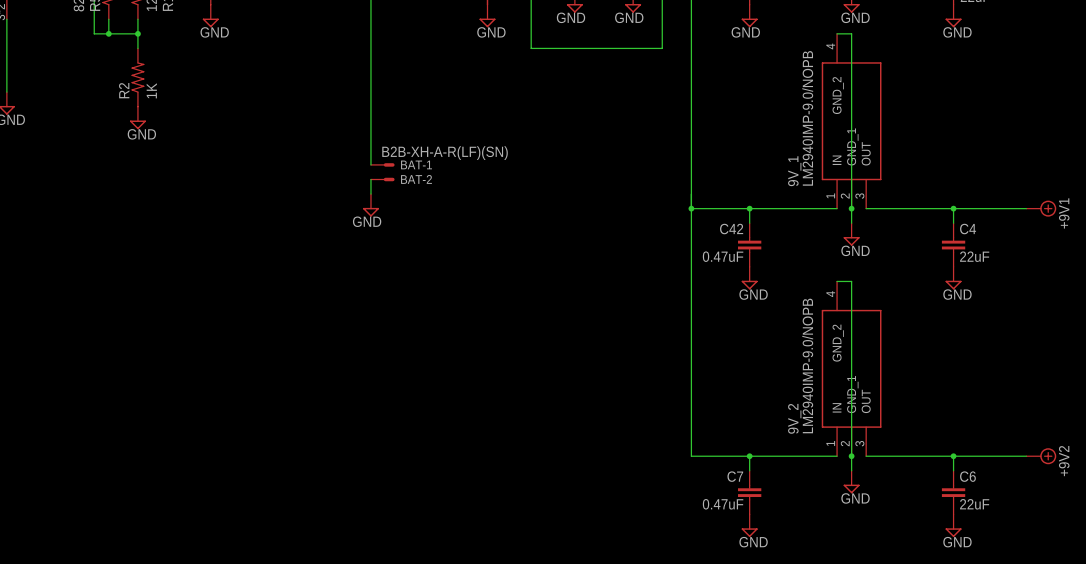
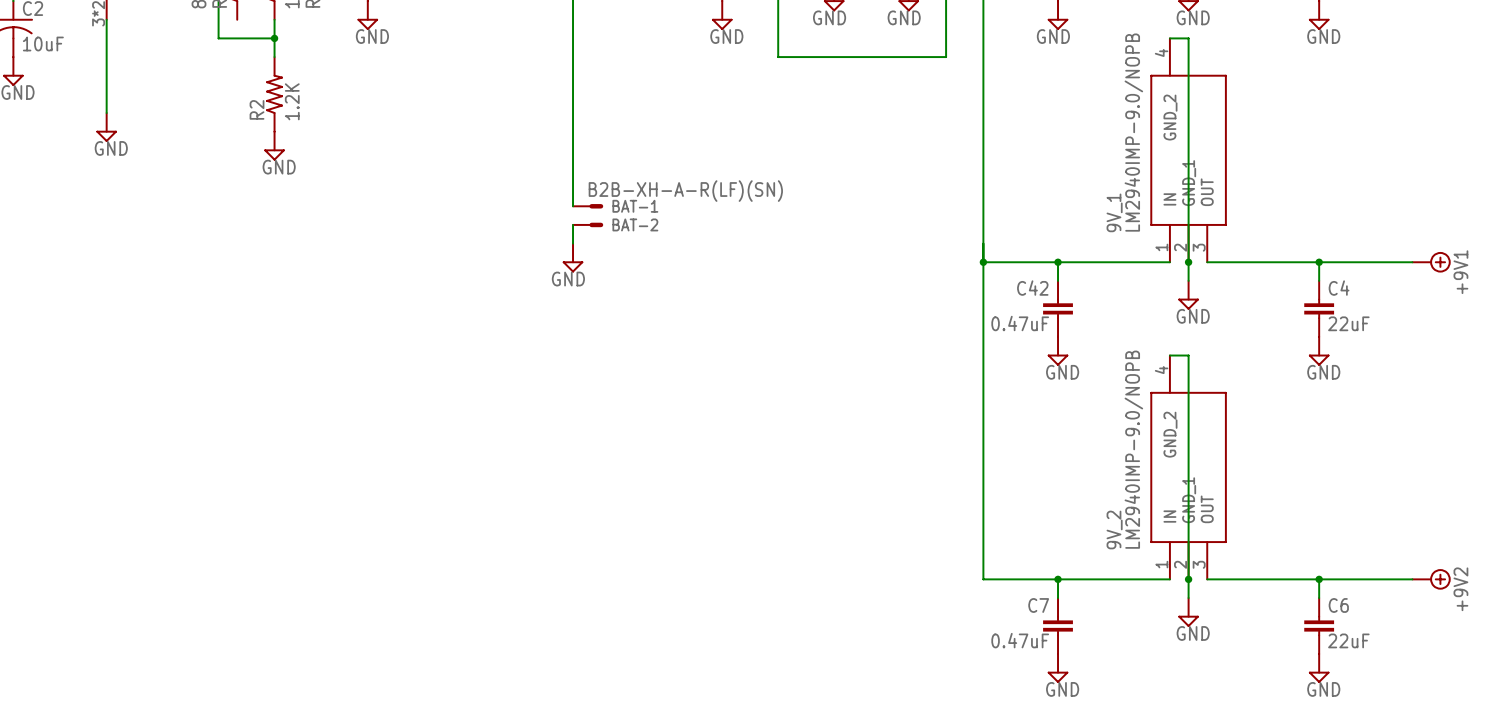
wire: (108, 19) (108, 33) -> none
junction: (108, 33) -> none
R2 value: 1K (151, 90) -> 1.2K (292, 101)

